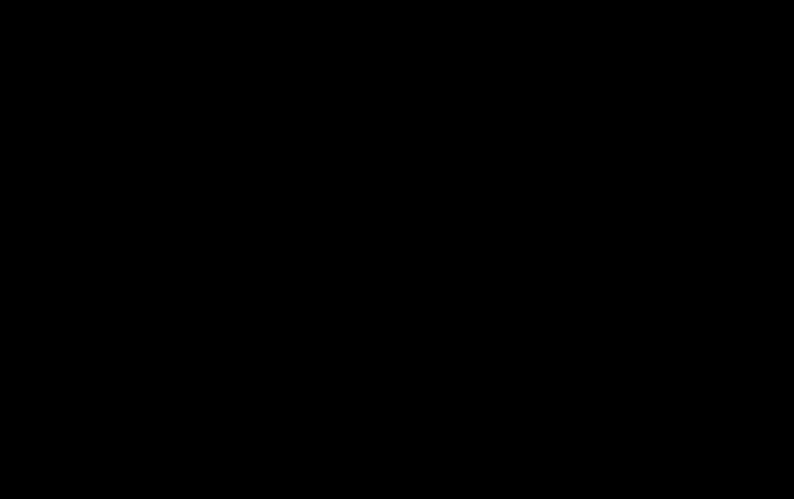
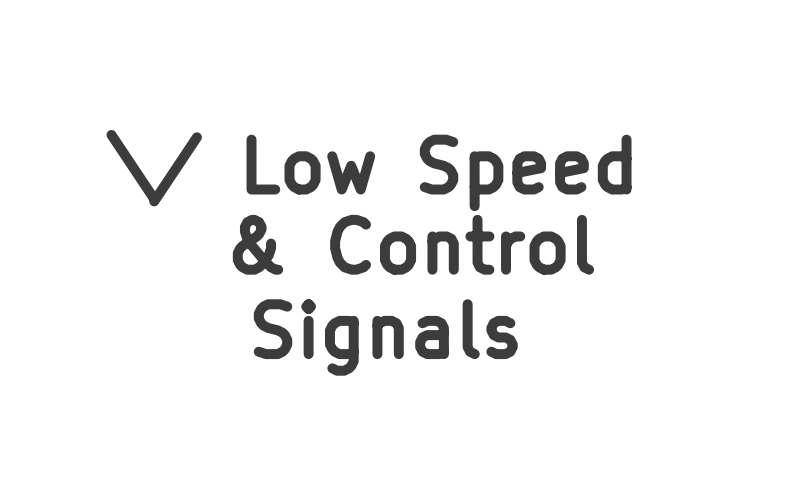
text: none -> \/ Low Speed (369, 170)
text: none -> & Control (413, 244)
text: none -> Signals (385, 337)

